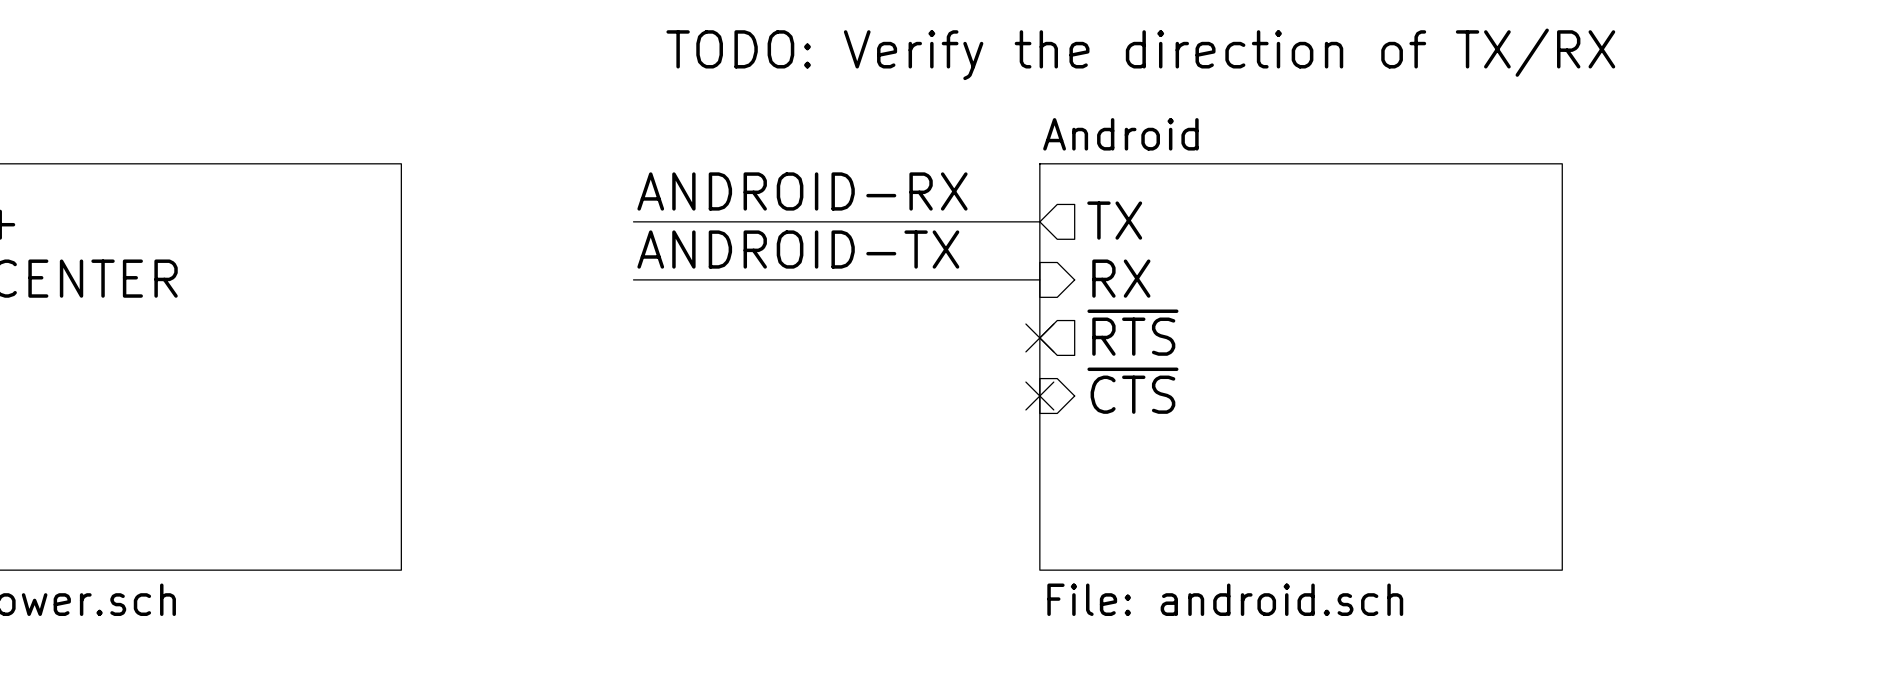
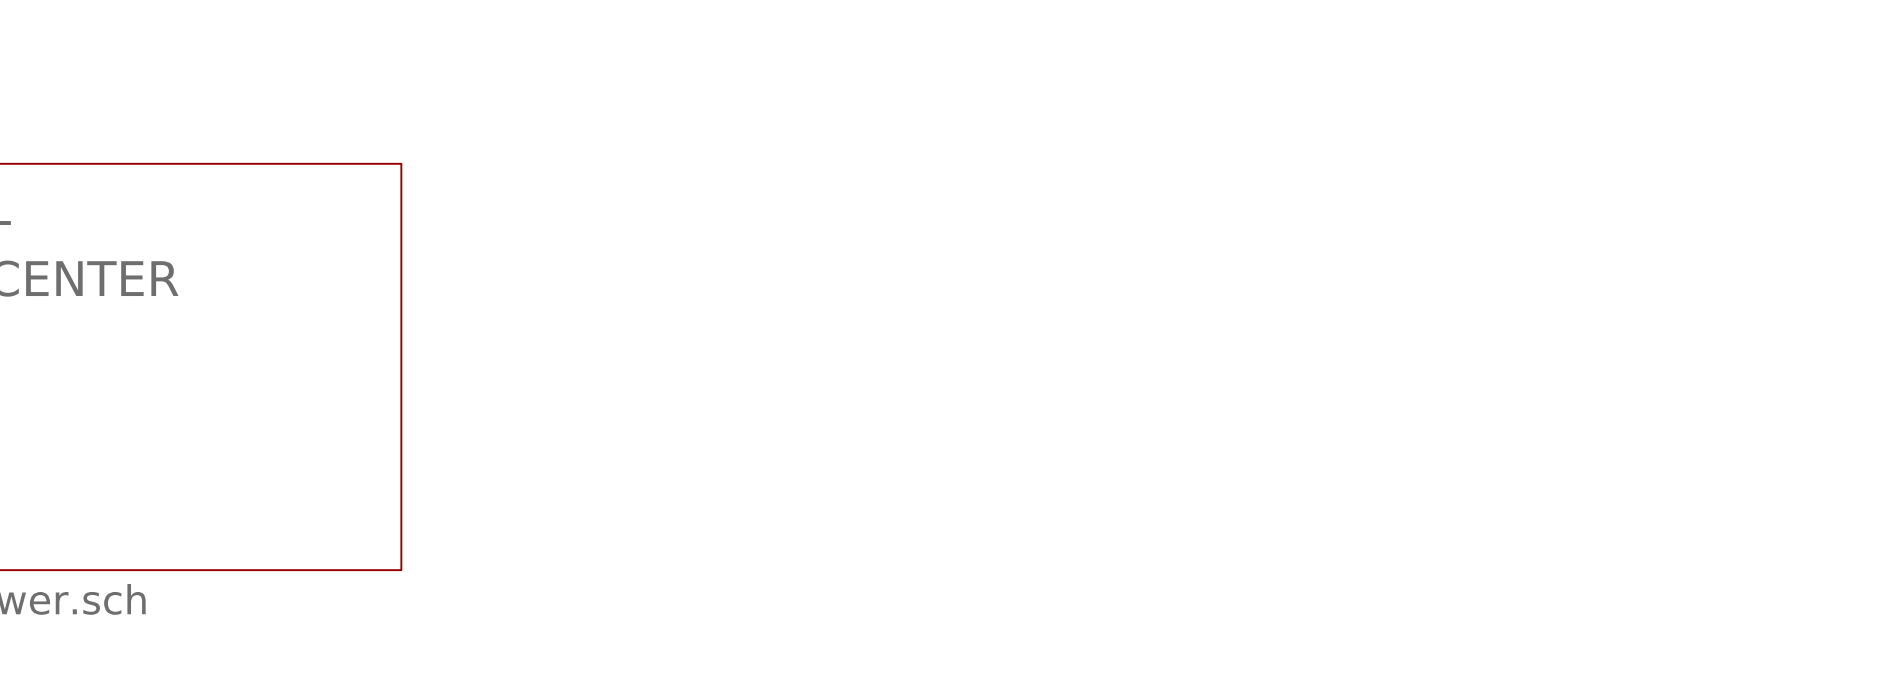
text: TODO: Verify the direction of TX/RX (1140, 54) -> none
label: ANDROID-RX (802, 191) -> none
sheet pin: TX (1114, 220) -> none
wire: (633, 221) (1039, 221) -> none
label: ANDROID-TX (798, 249) -> none
sheet pin: RX (1121, 278) -> none
wire: (633, 279) (1039, 279) -> none
sheet pin: ~{RTS} (1132, 332) -> none
no-connect mark: (1039, 337) -> none
sheet Android: File: android.sch (1301, 366) -> none
sheet pin: ~{CTS} (1132, 390) -> none
no-connect mark: (1039, 396) -> none

